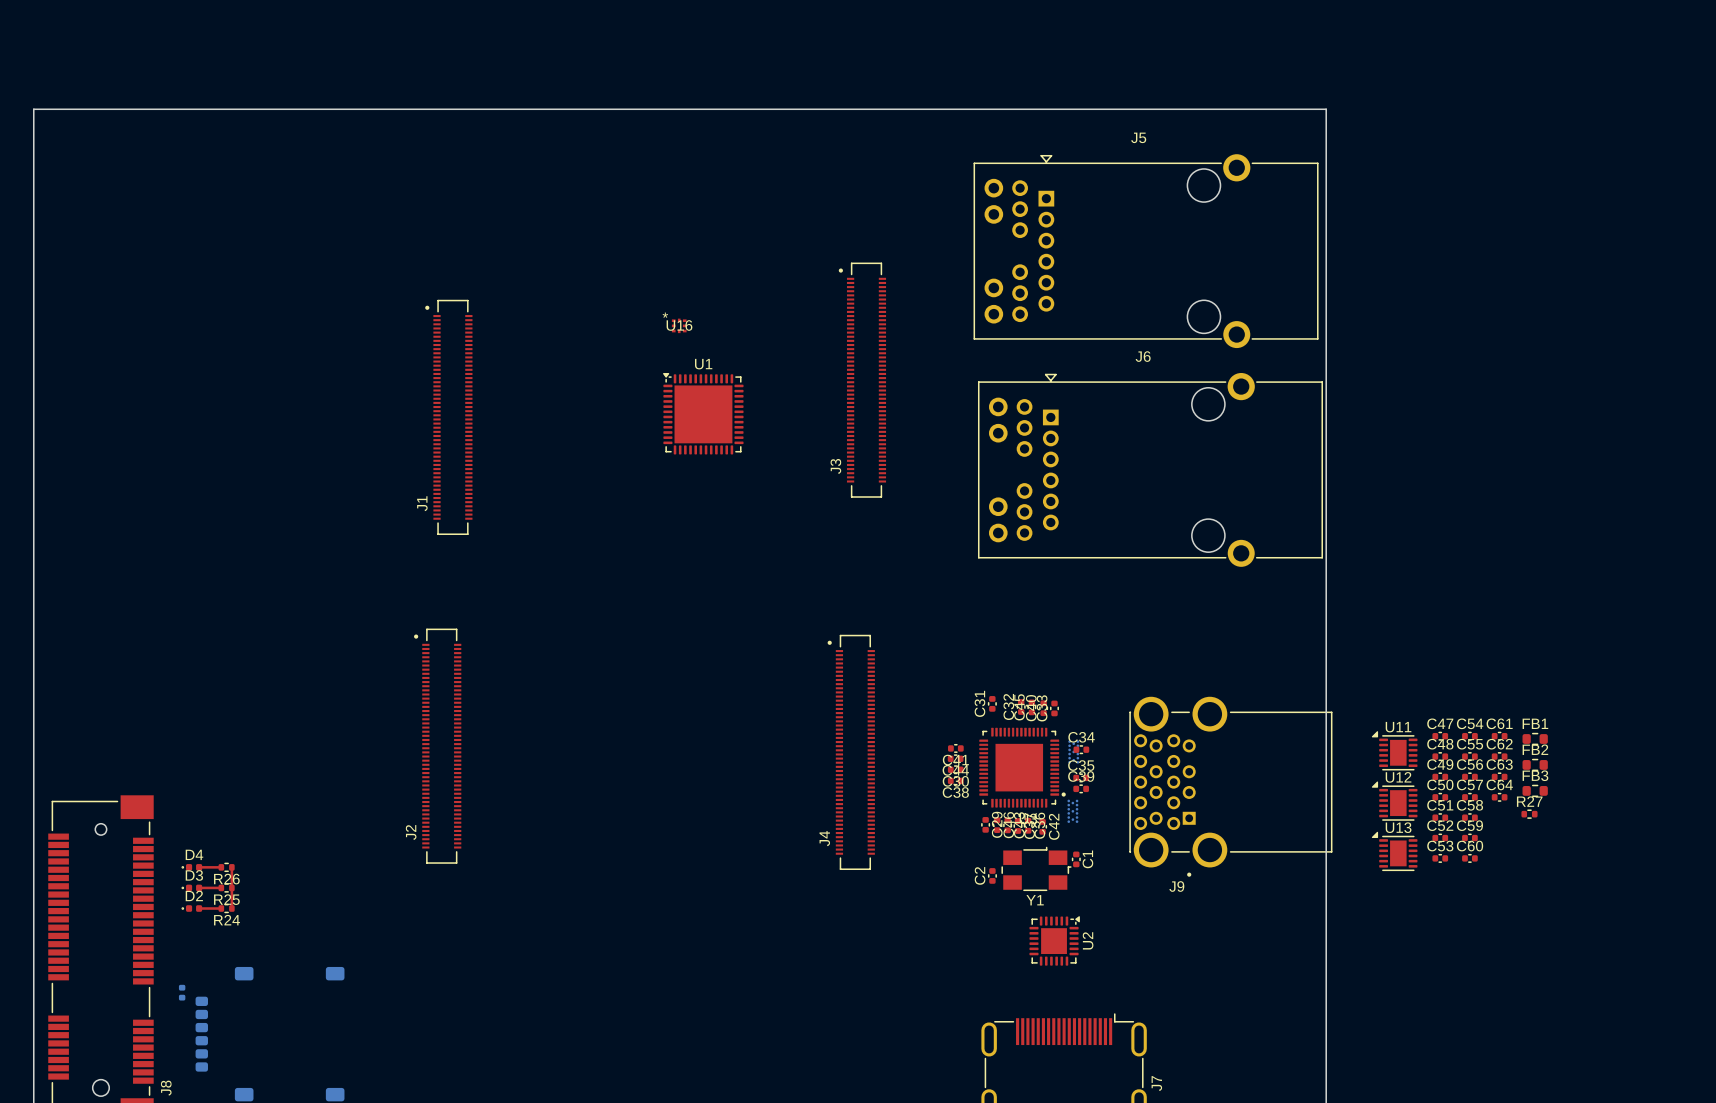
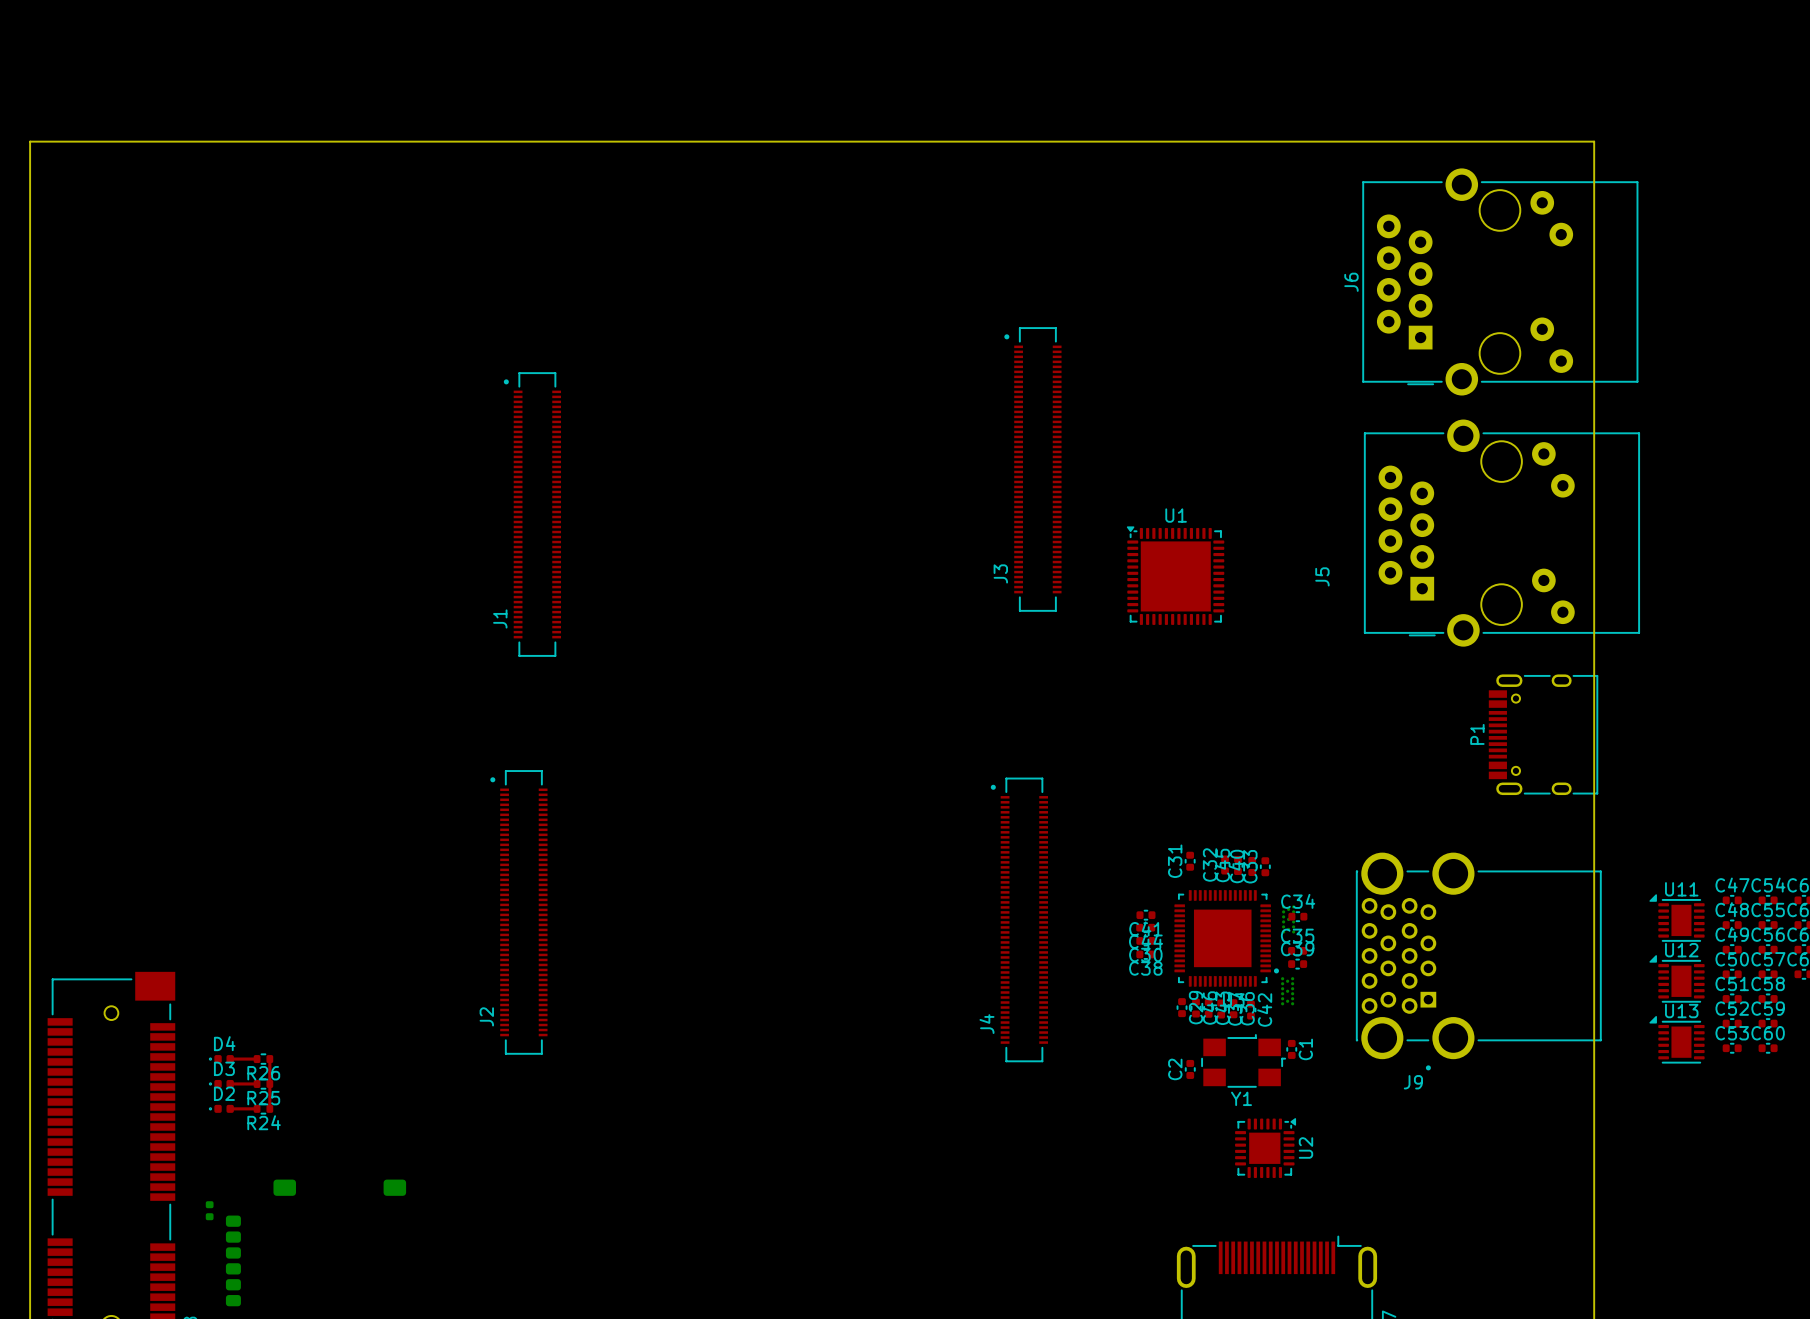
J5 name position: J5 (1138, 137) -> J5 (1322, 576)
J5 footprint: [973, 154, 1319, 349] -> [1364, 419, 1640, 647]
U16: (679, 325) -> none
J6 name position: J6 (1143, 356) -> J6 (1351, 282)
J6 footprint: [978, 372, 1323, 567] -> [1362, 168, 1639, 396]
U1 position: (703, 413) -> (1175, 575)
P1: none -> (1543, 734)

